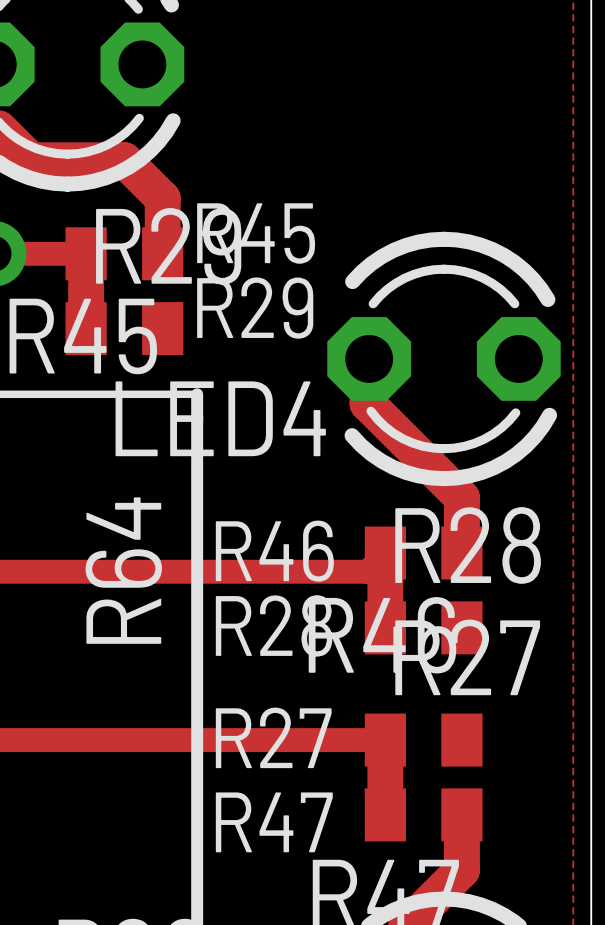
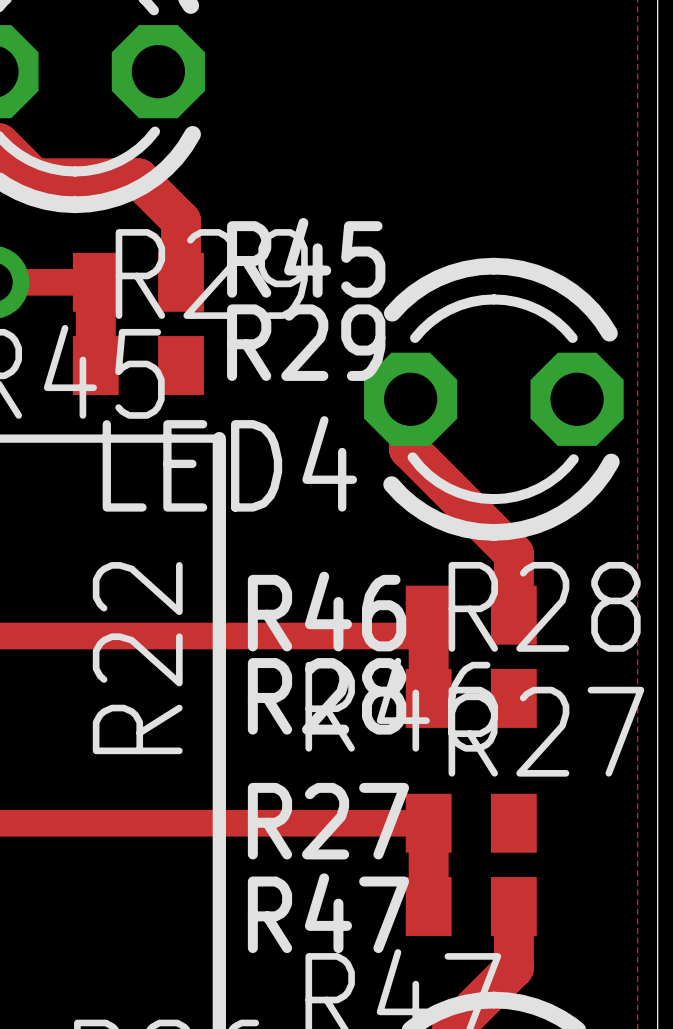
R64 name: R64 (123, 570) -> R22 (137, 658)

